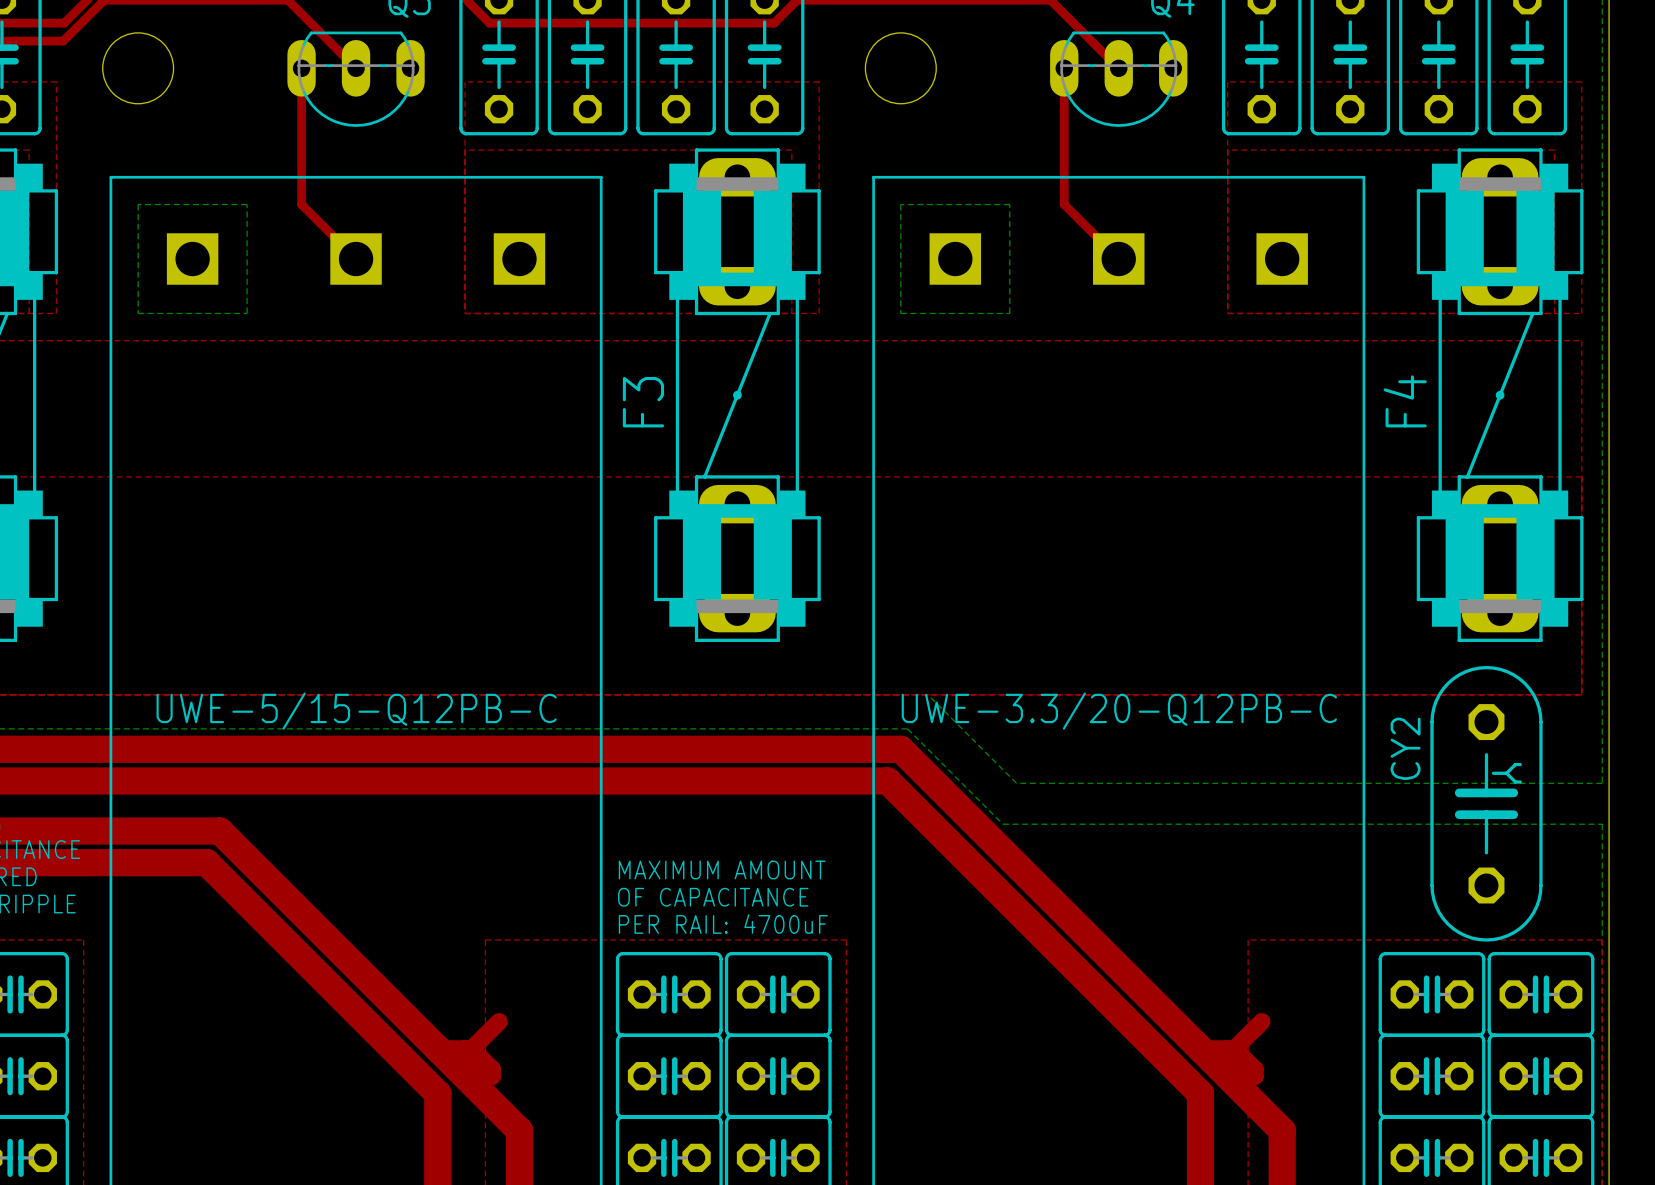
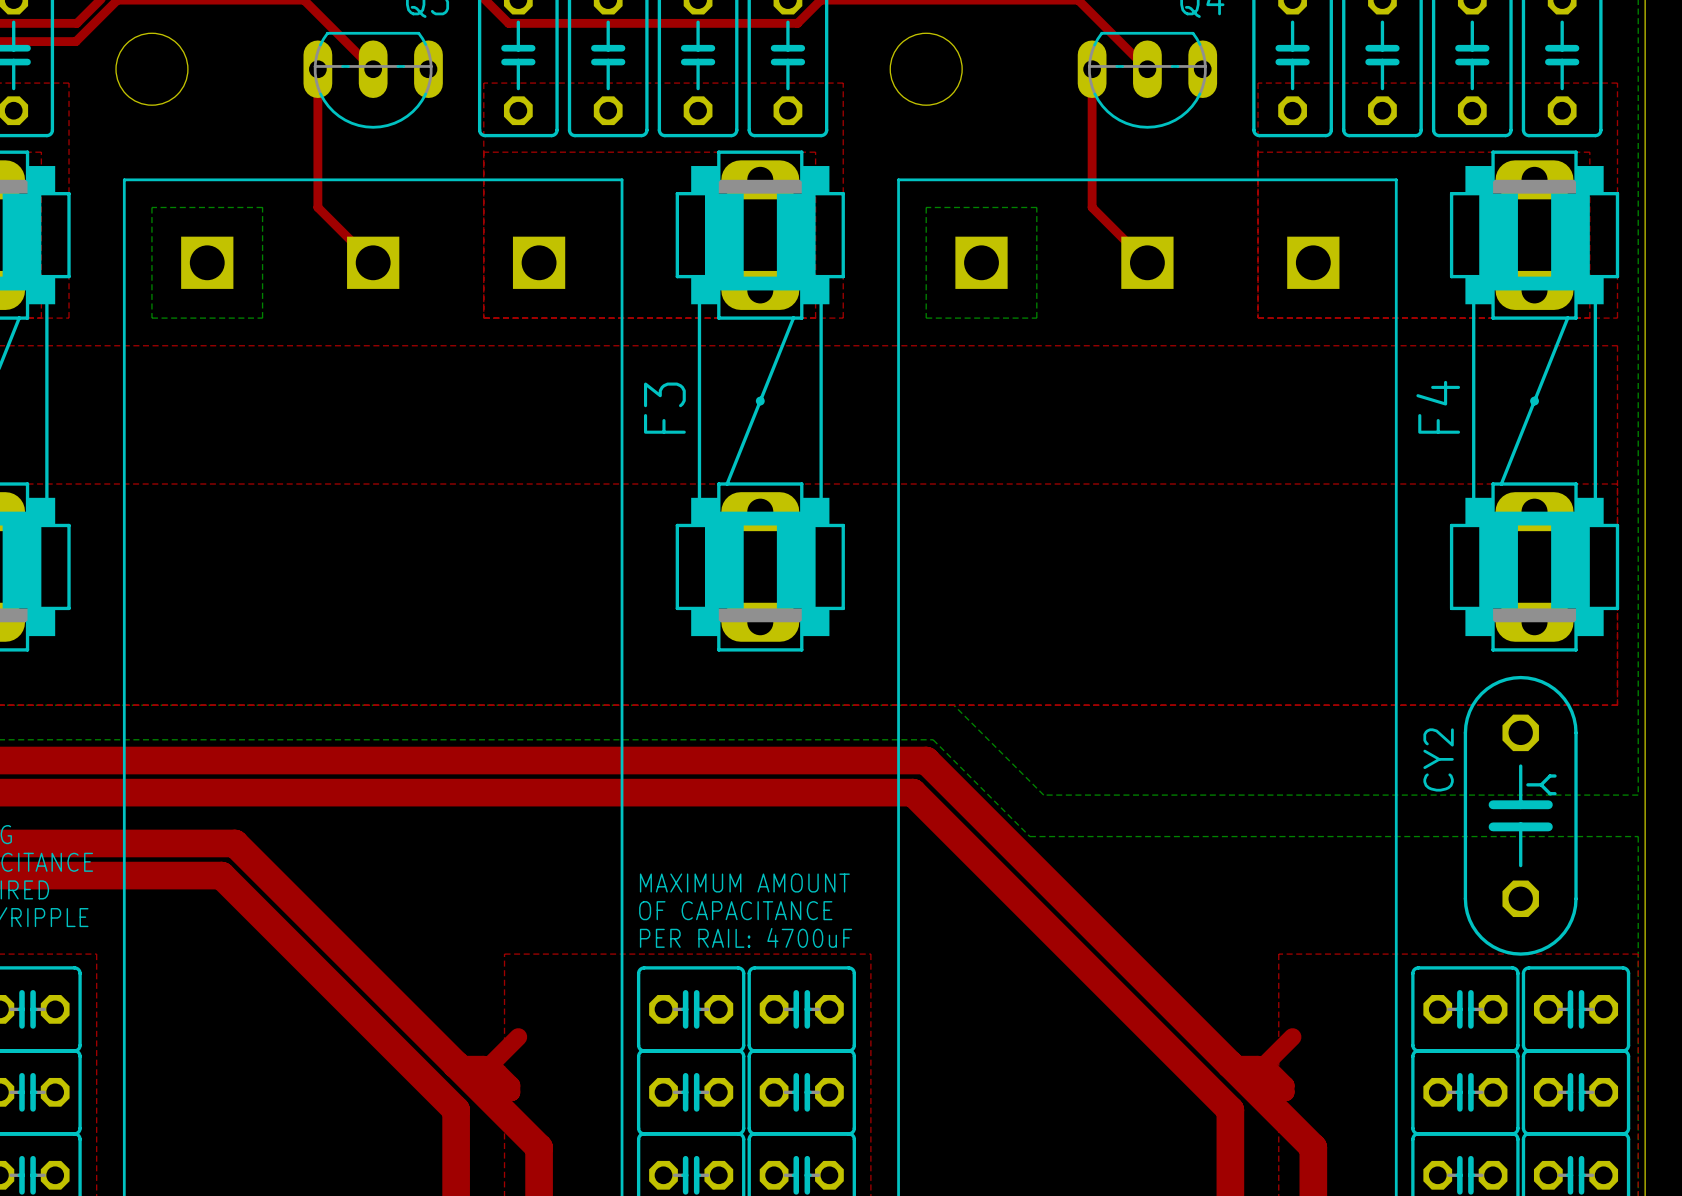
text: UWE-5/15-Q12PB-C (356, 711) -> none
text: UWE-3.3/20-Q12PB-C (1119, 711) -> none

